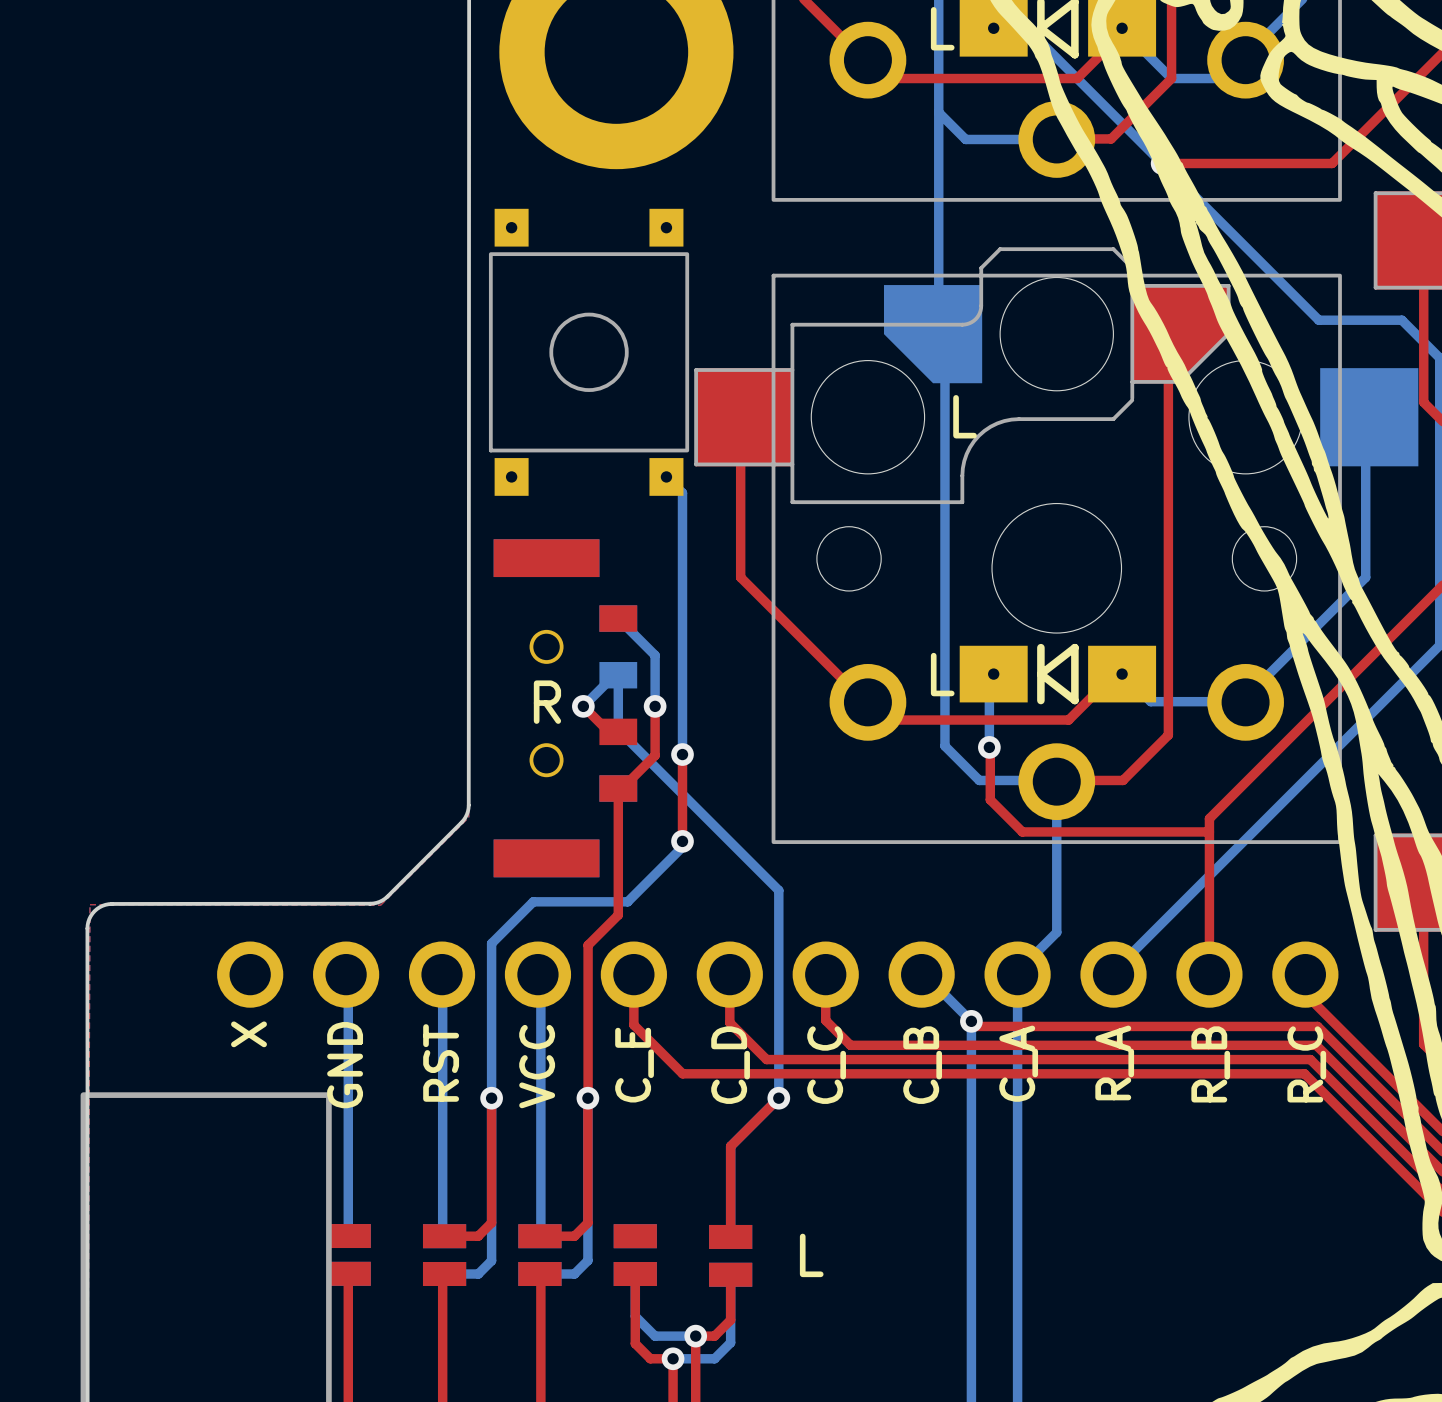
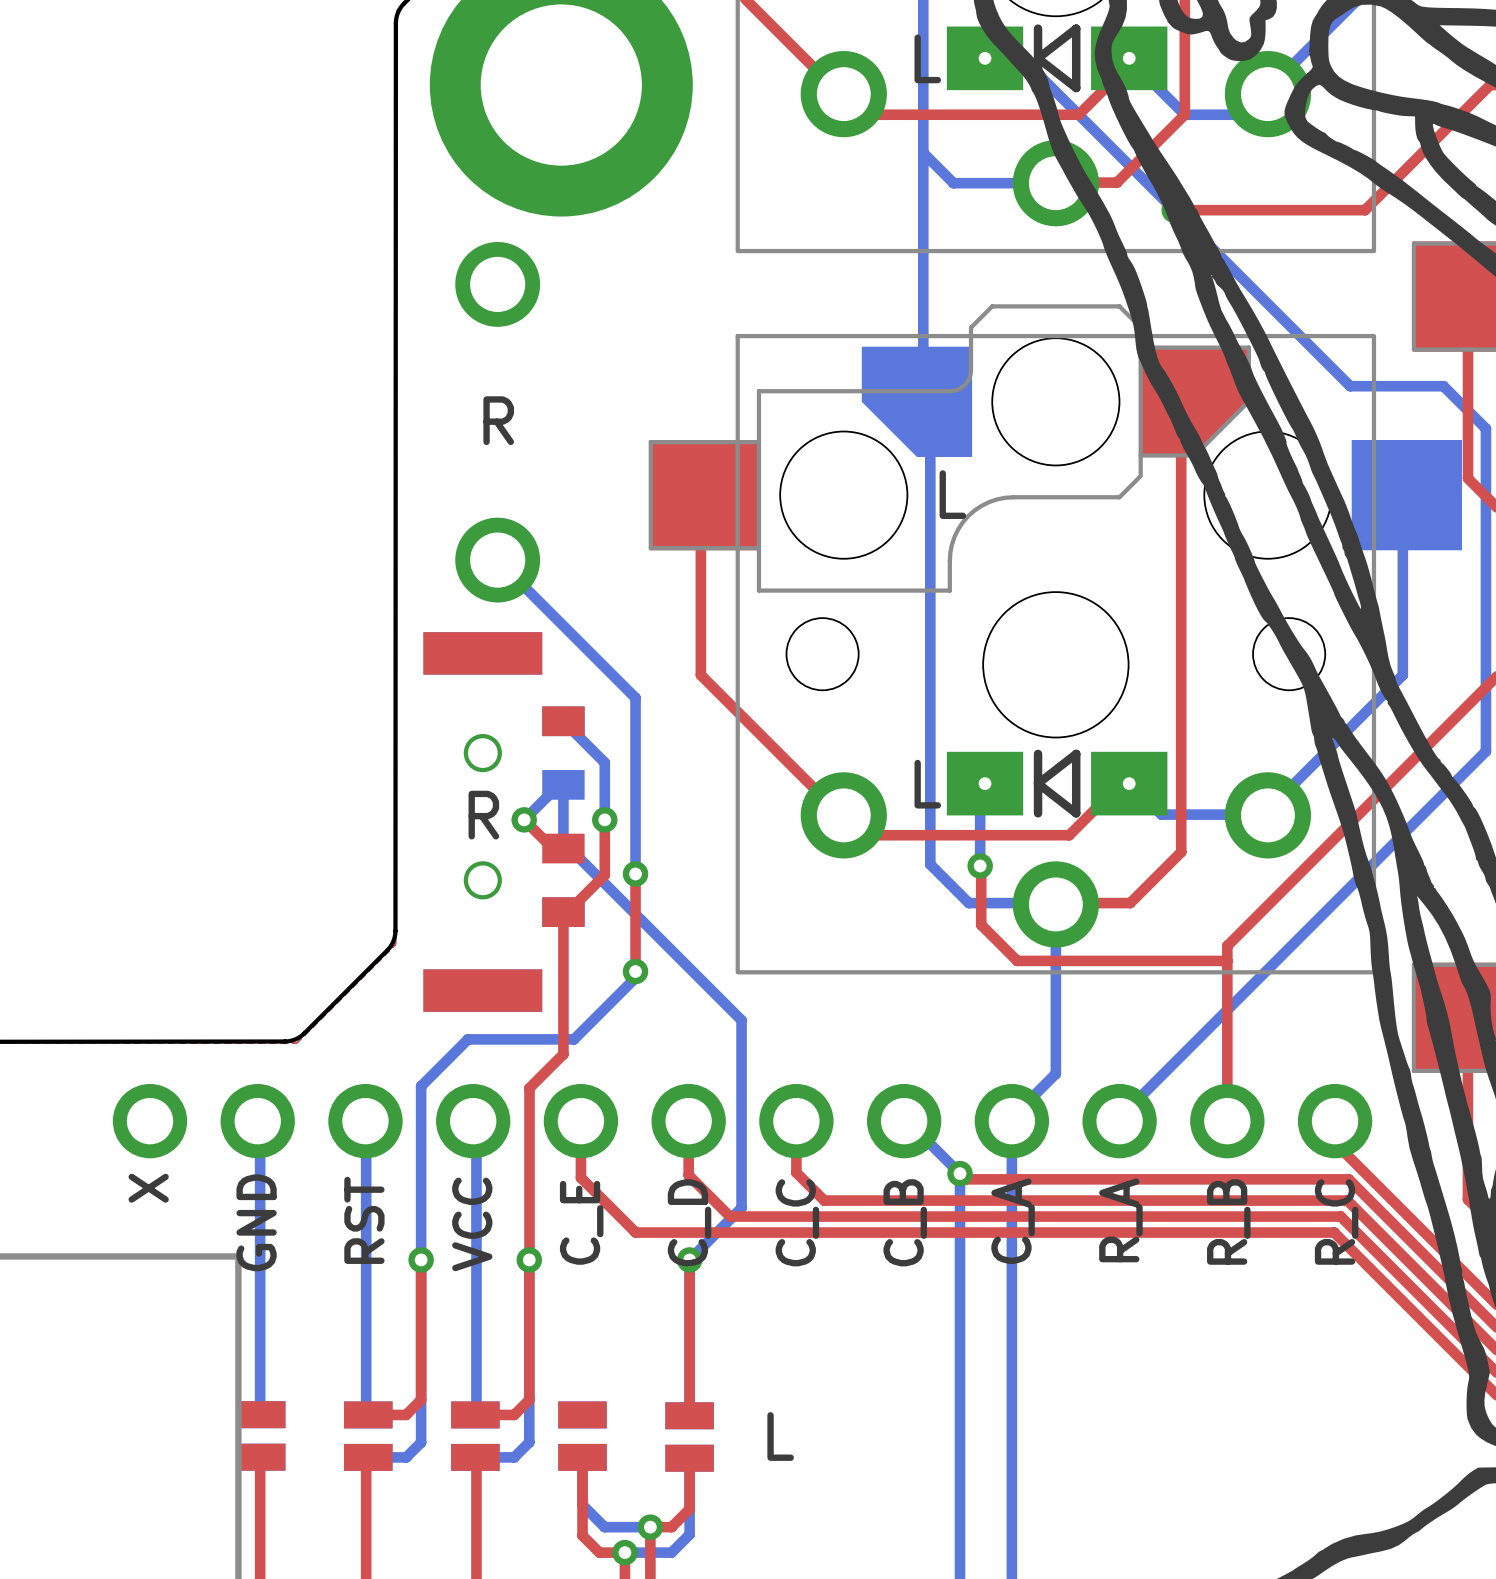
part footprint: [488, 208, 690, 496] -> [455, 241, 541, 603]
bottom track: (666, 476) (682, 493) (682, 597) -> (497, 560) (635, 697)
bottom track: (618, 726) (618, 729) (778, 890) (778, 1098) (730, 1146) -> (563, 842) (741, 1020) (741, 1207) (689, 1259) (689, 1314)
top track: (778, 1098) (730, 1146) -> (689, 1259) (689, 1314)
via position: (778, 1098) -> (689, 1259)

